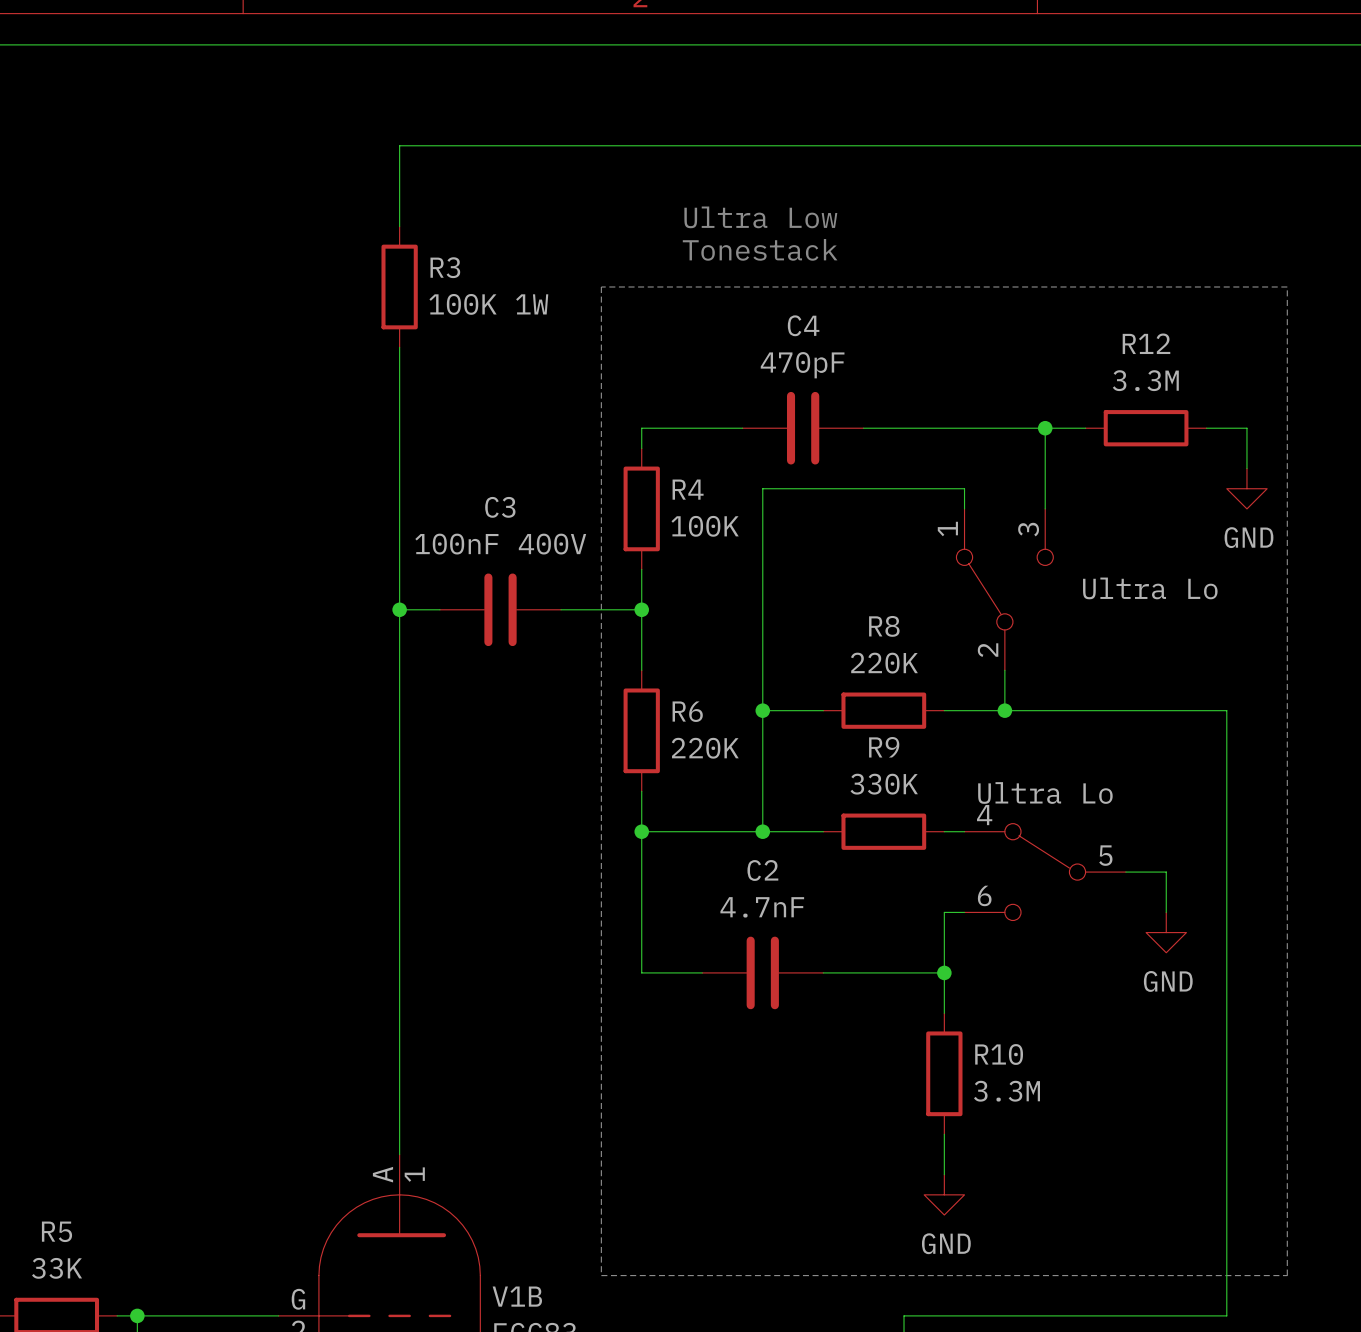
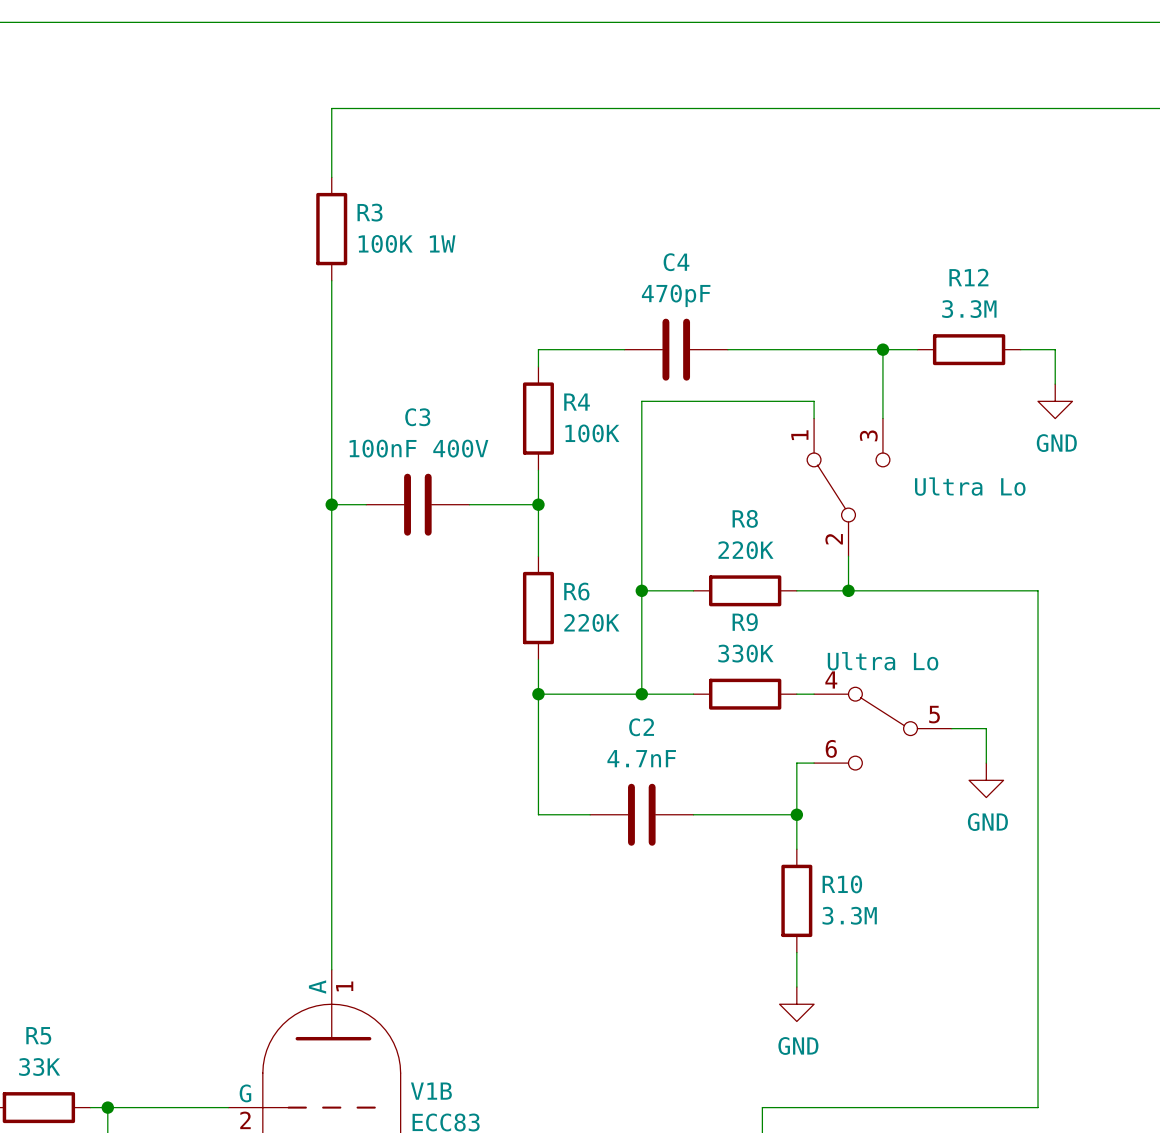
text: Ultra Low (760, 217) -> none
text: Tonestack (760, 249) -> none
line: (601, 286) (601, 1275) (1287, 1275) (1287, 286) (601, 286) -> none

